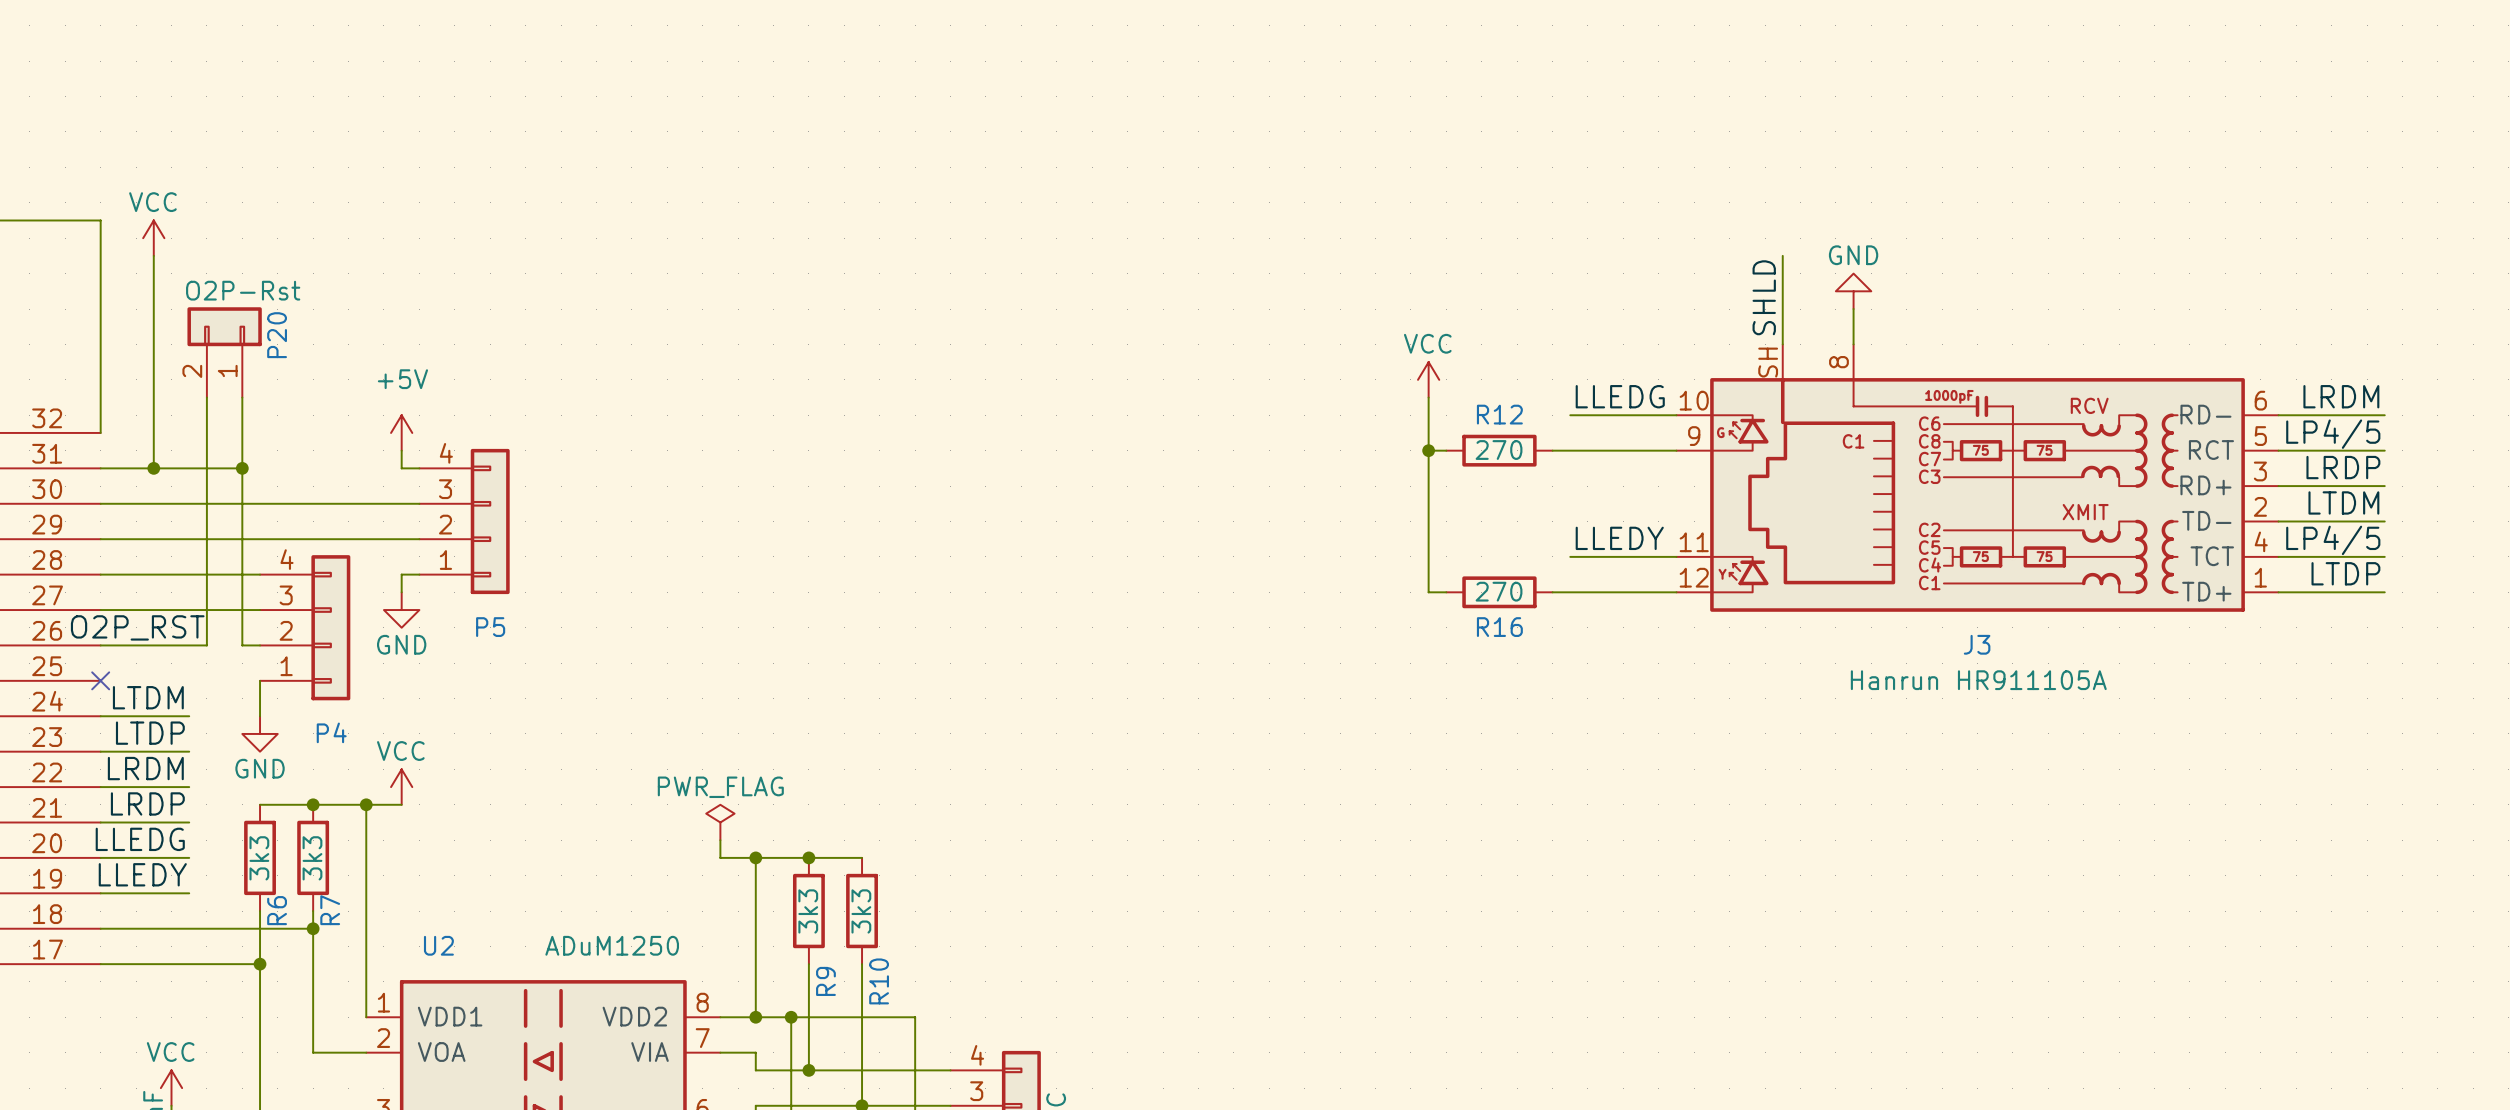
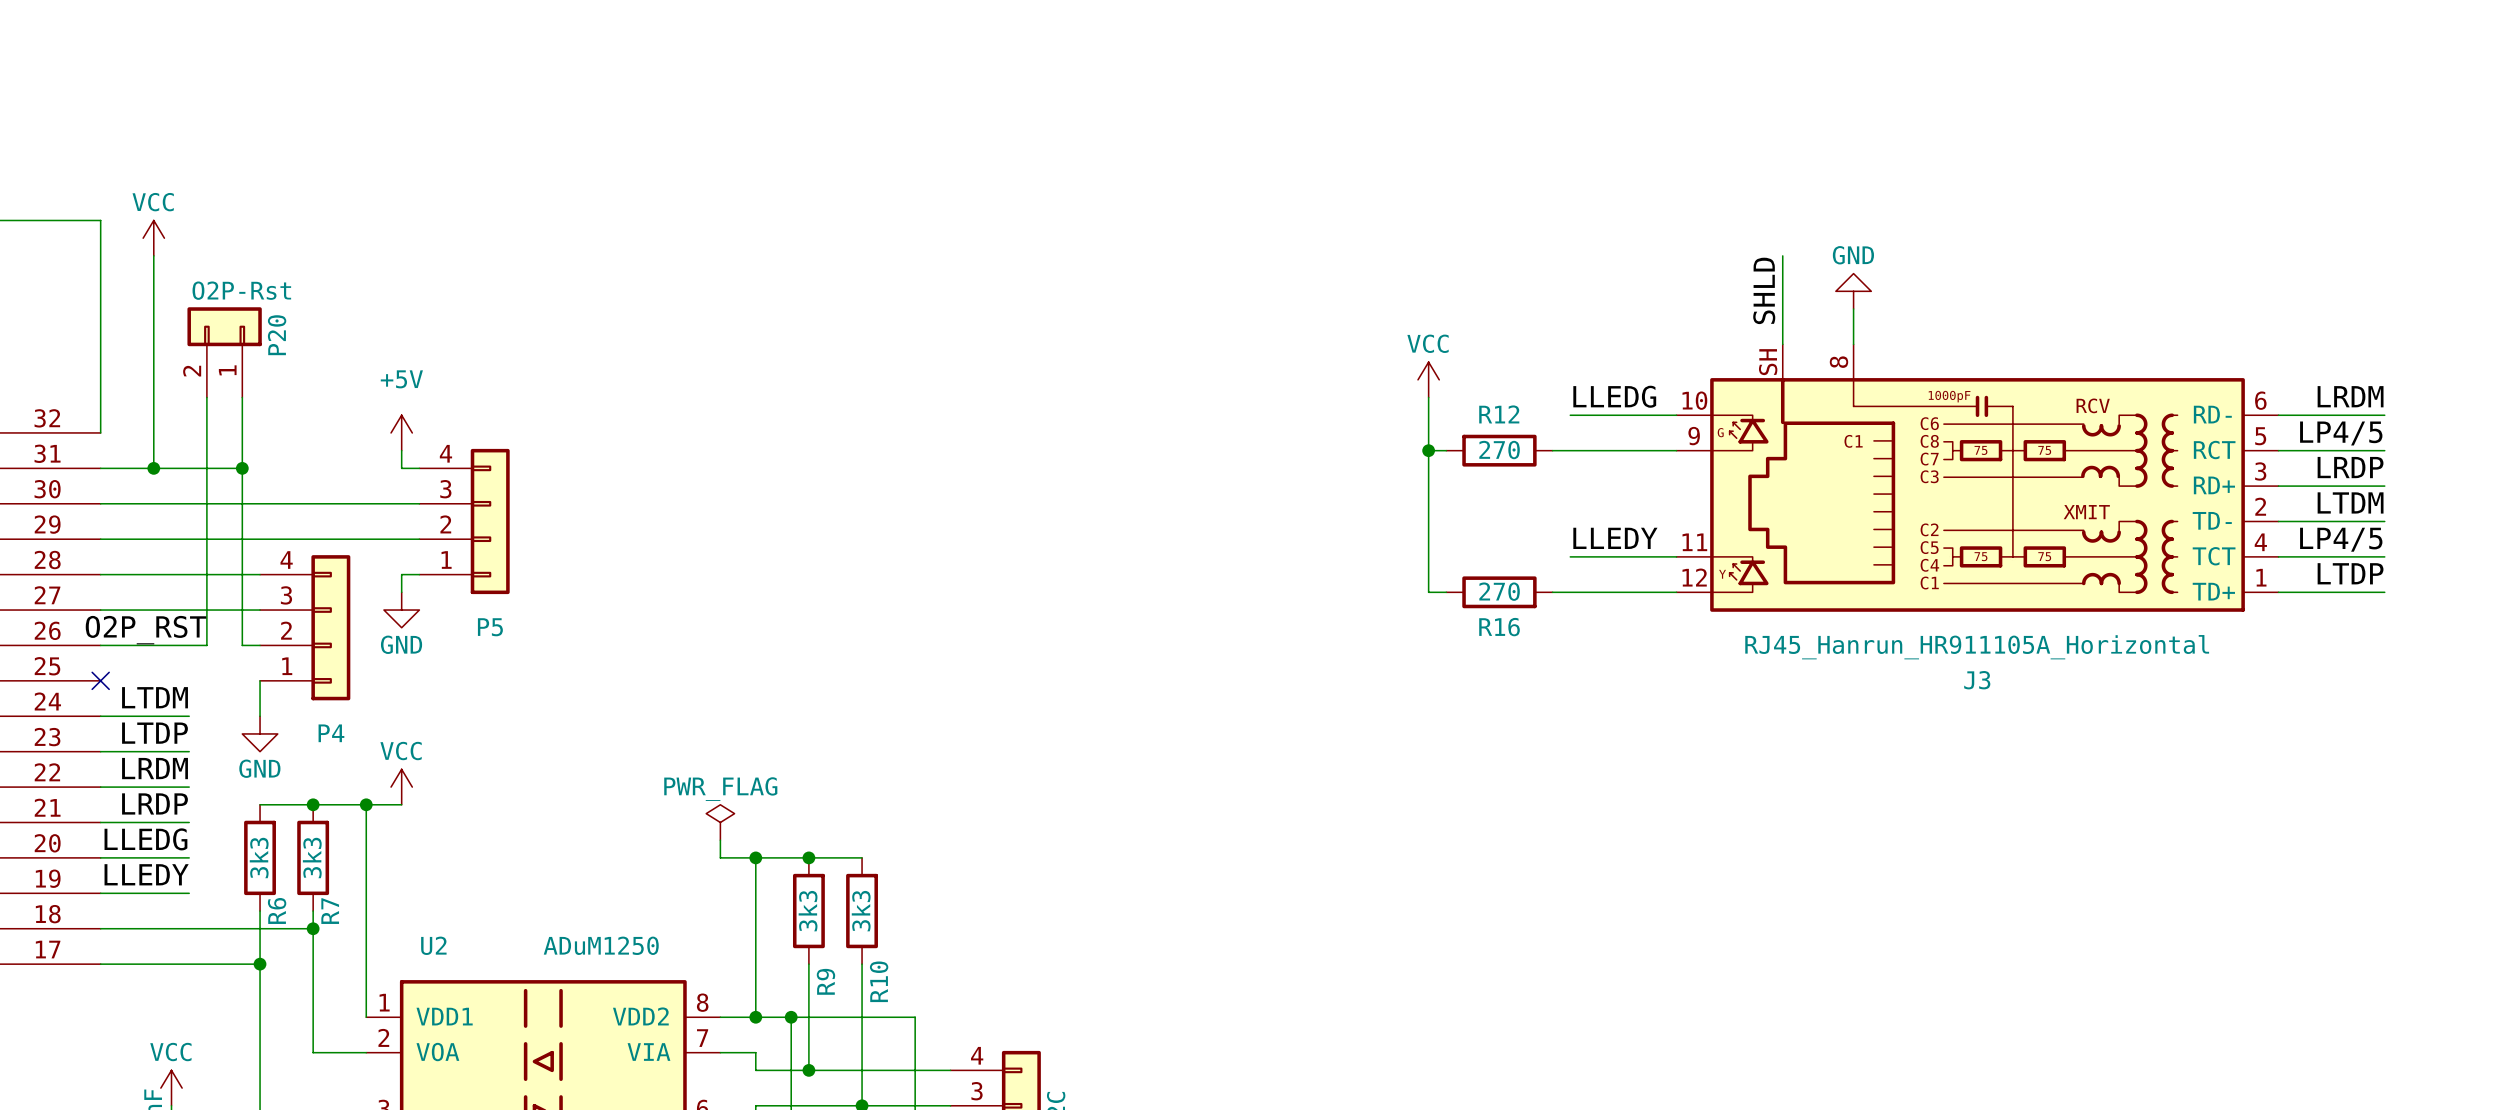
J3 name position: J3 (1977, 644) -> J3 (1977, 680)
J3 value: Hanrun HR911105A (1978, 680) -> RJ45_Hanrun_HR911105A_Horizontal (1977, 647)

